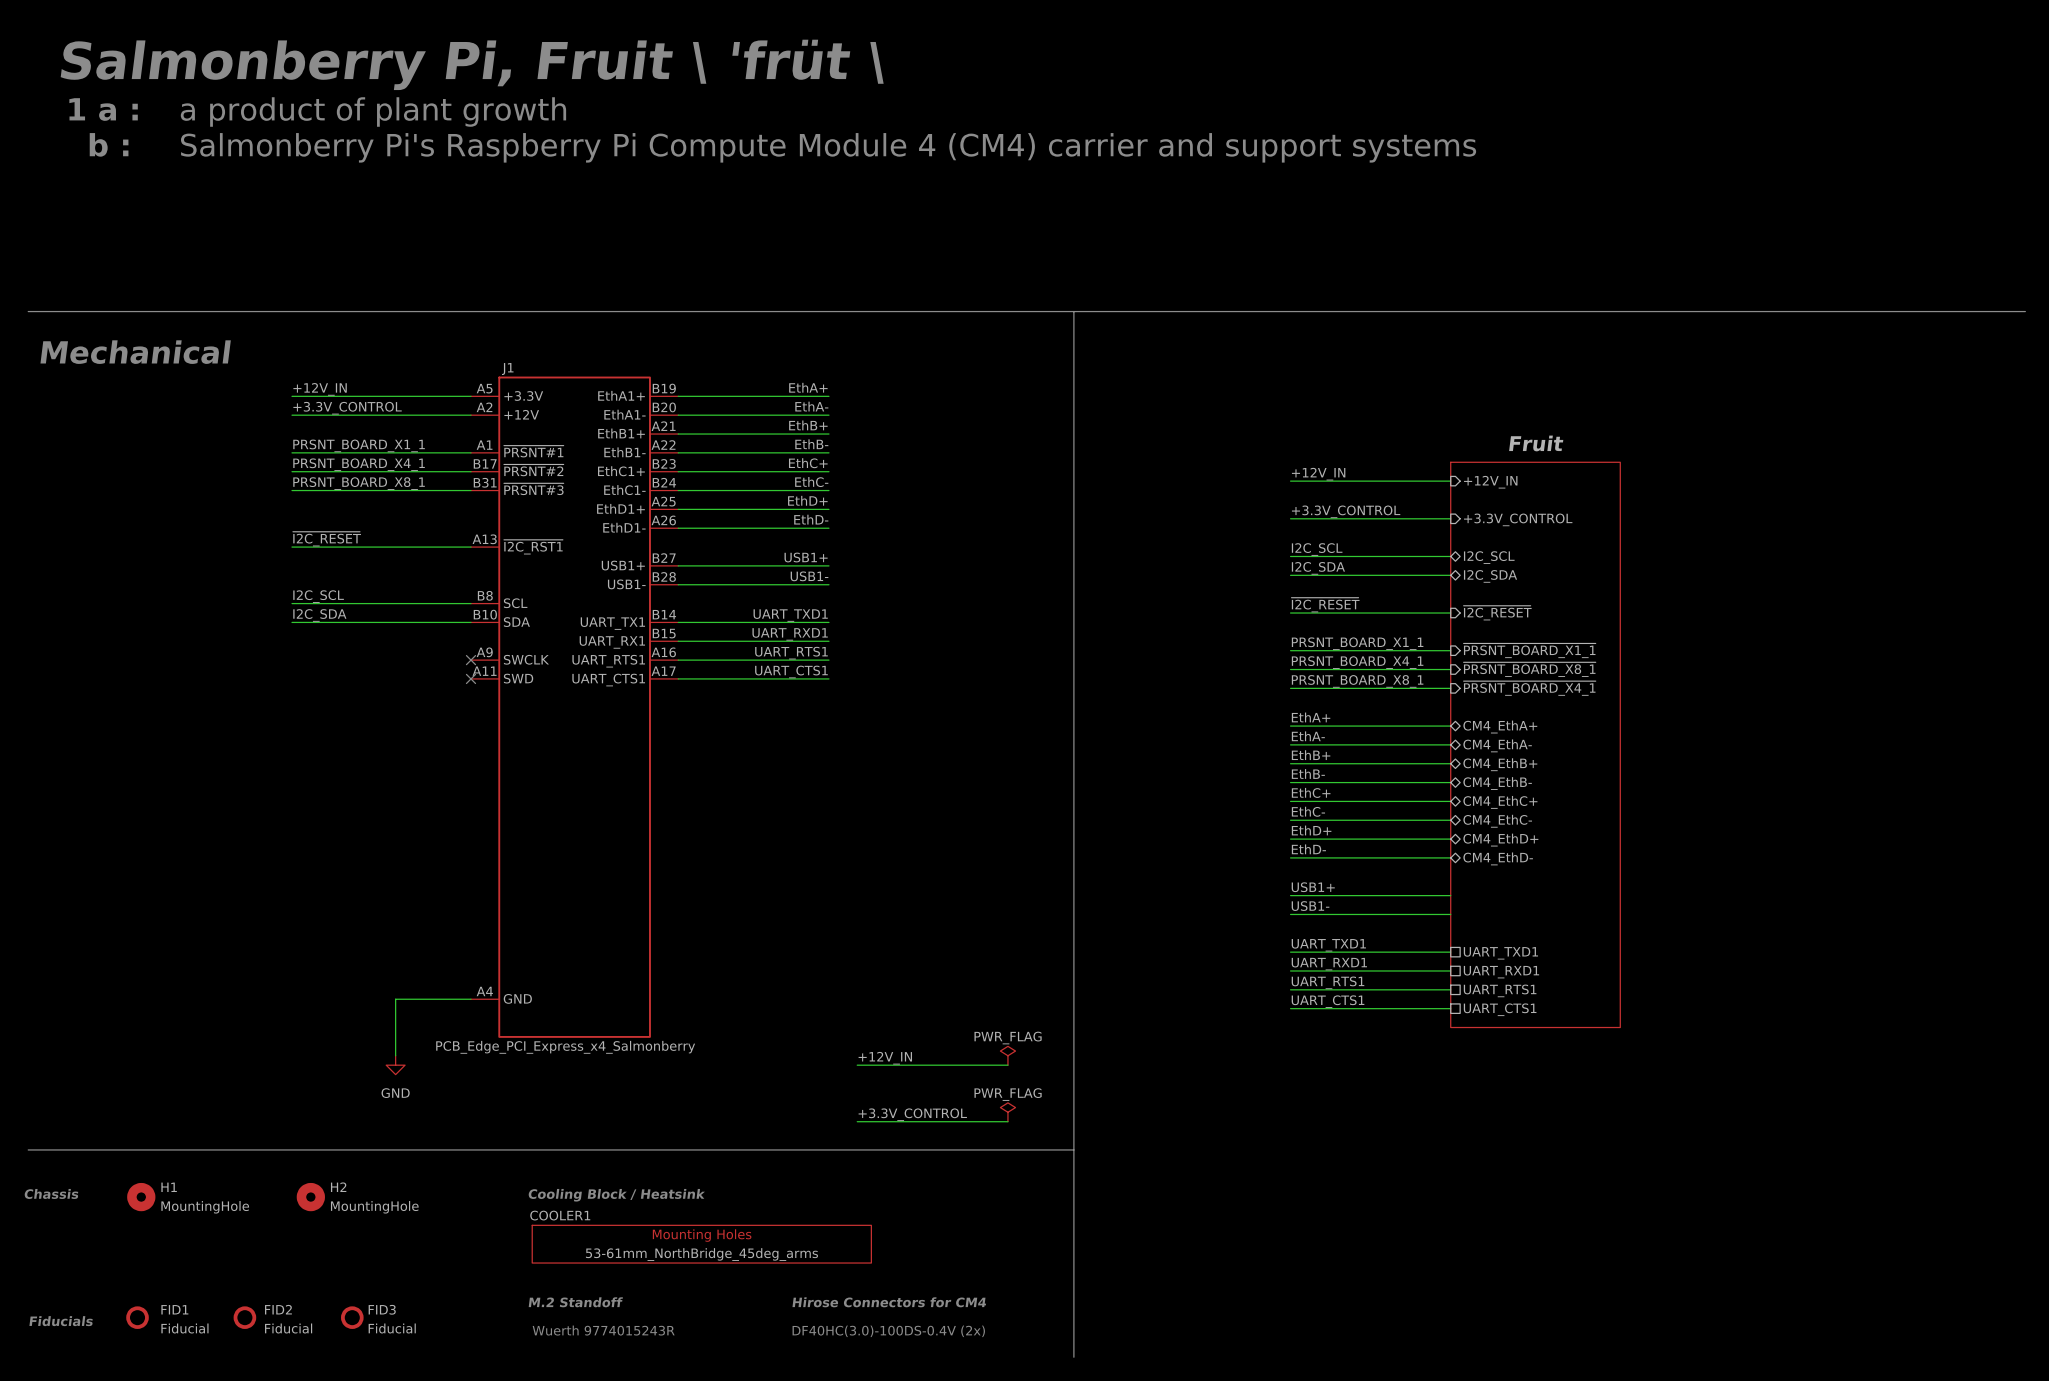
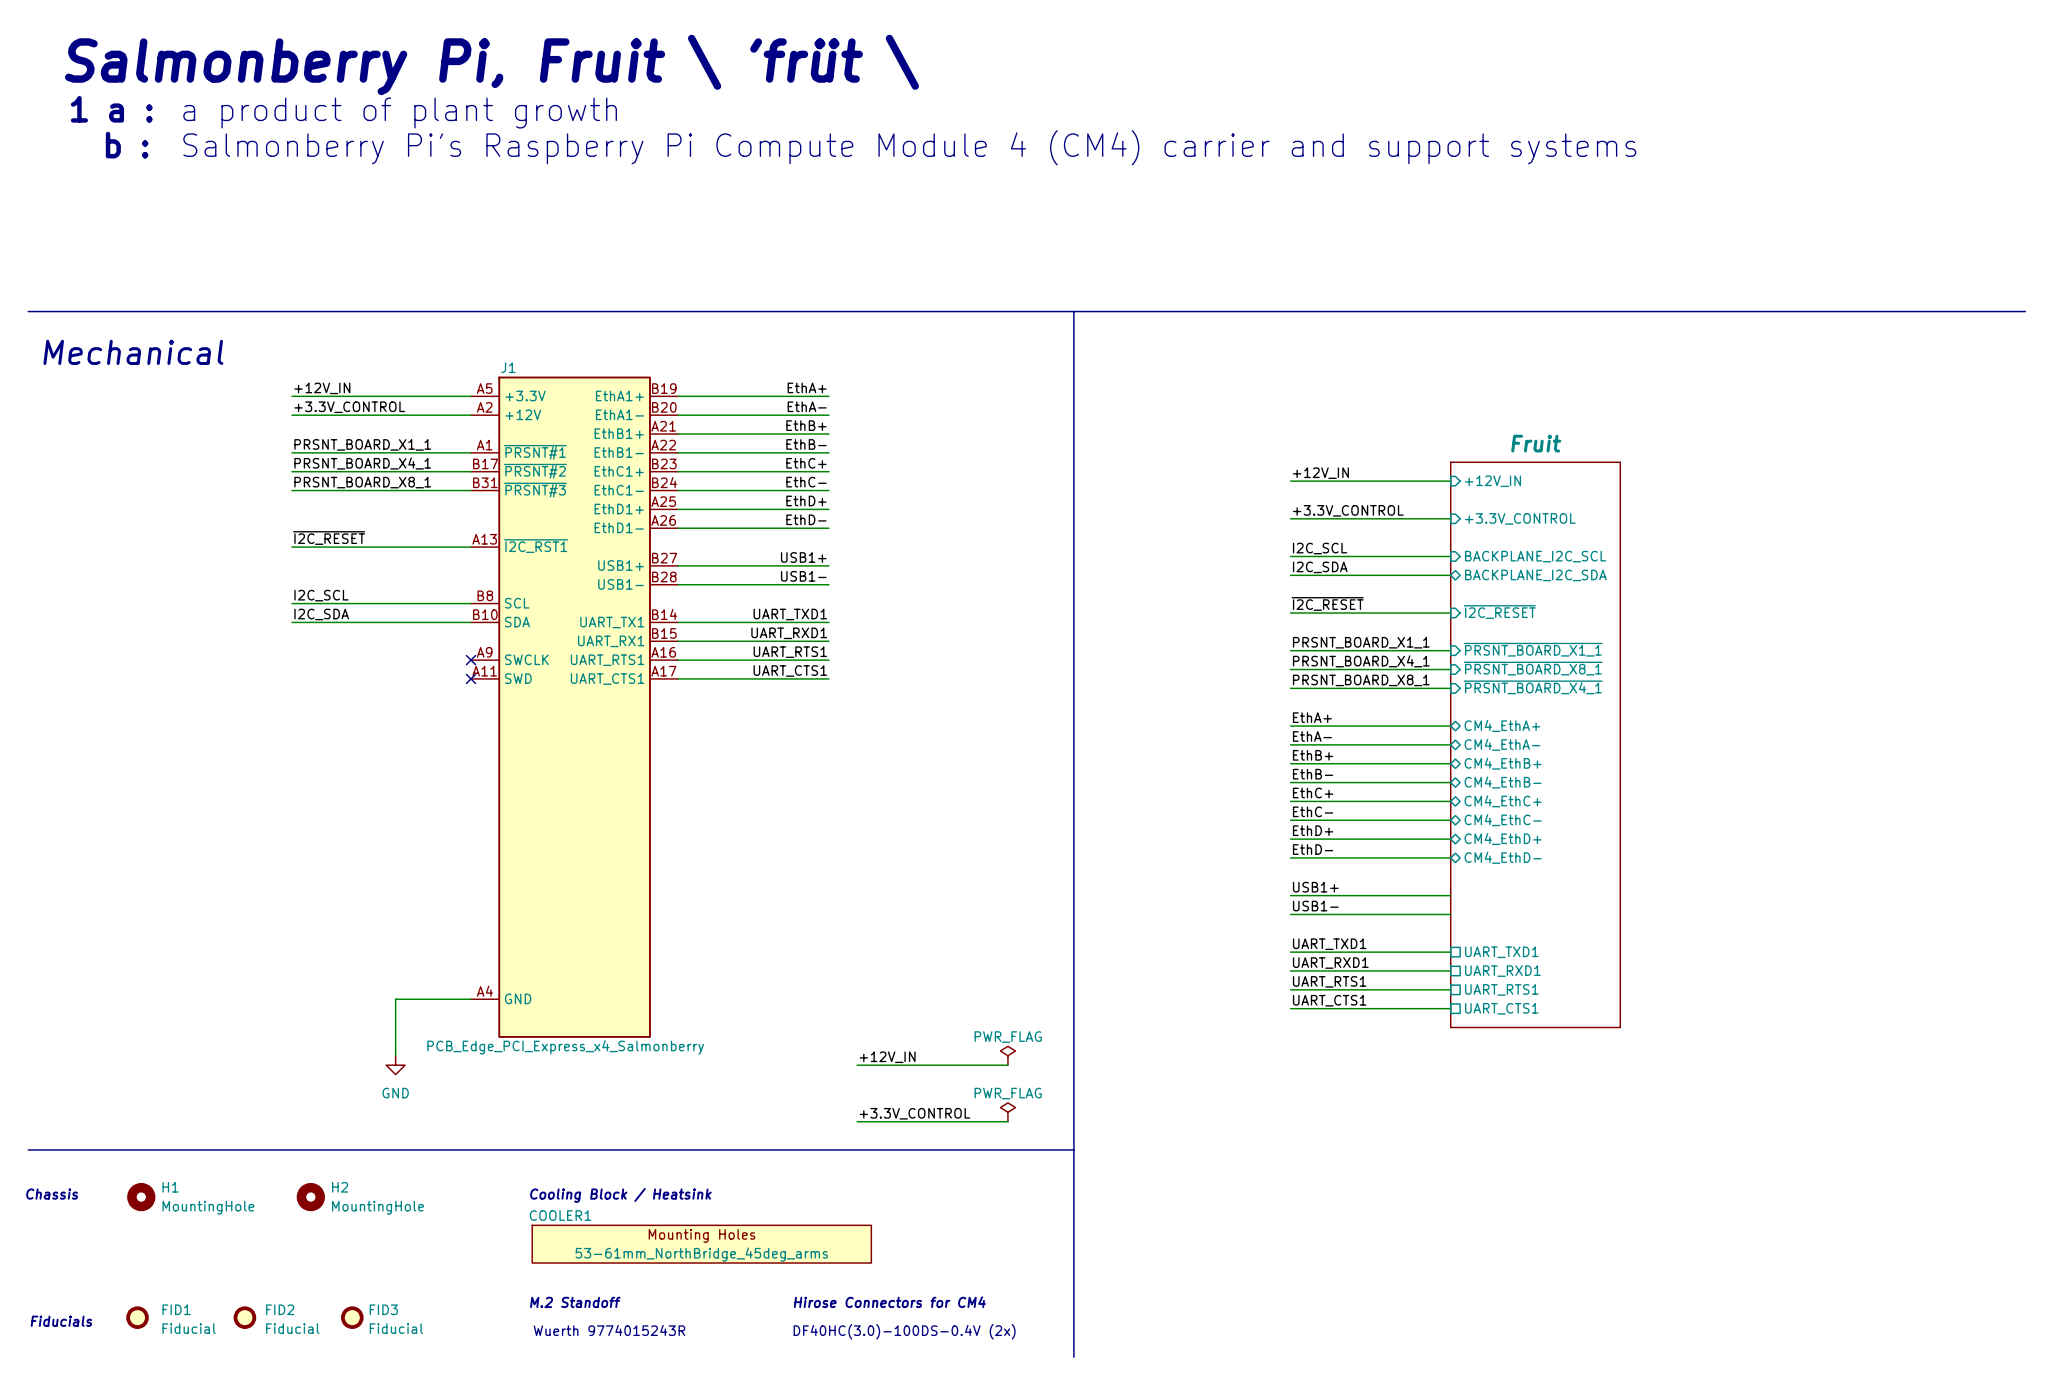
sheet pin shape: bidirectional (1489, 557) -> input (1535, 556)
sheet pin: I2C_SCL (1489, 557) -> BACKPLANE_I2C_SCL (1535, 556)
sheet pin: I2C_SDA (1490, 576) -> BACKPLANE_I2C_SDA (1535, 575)

